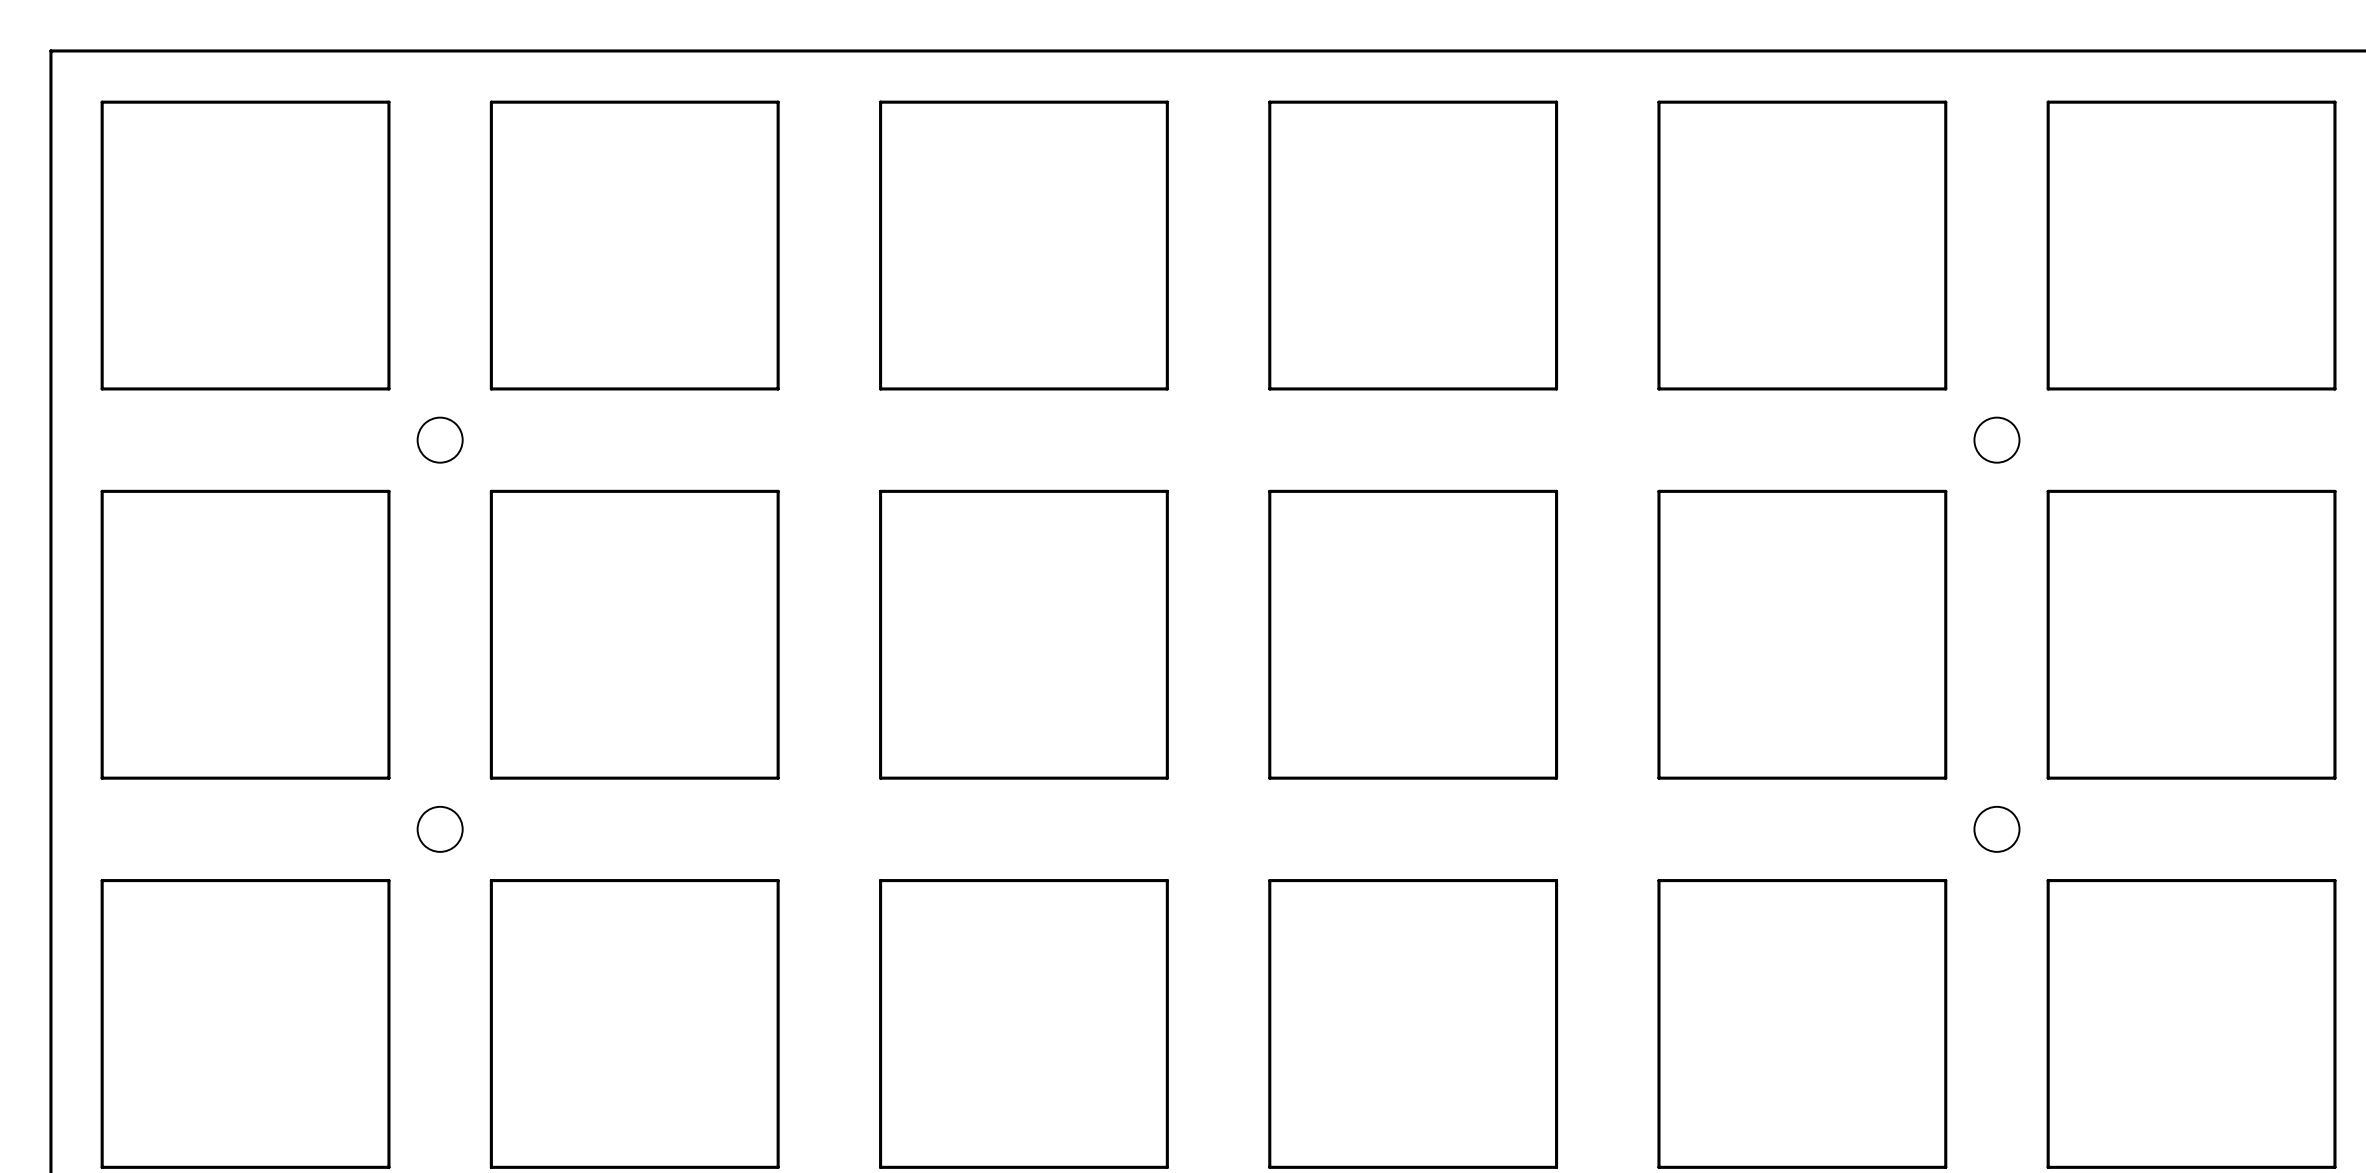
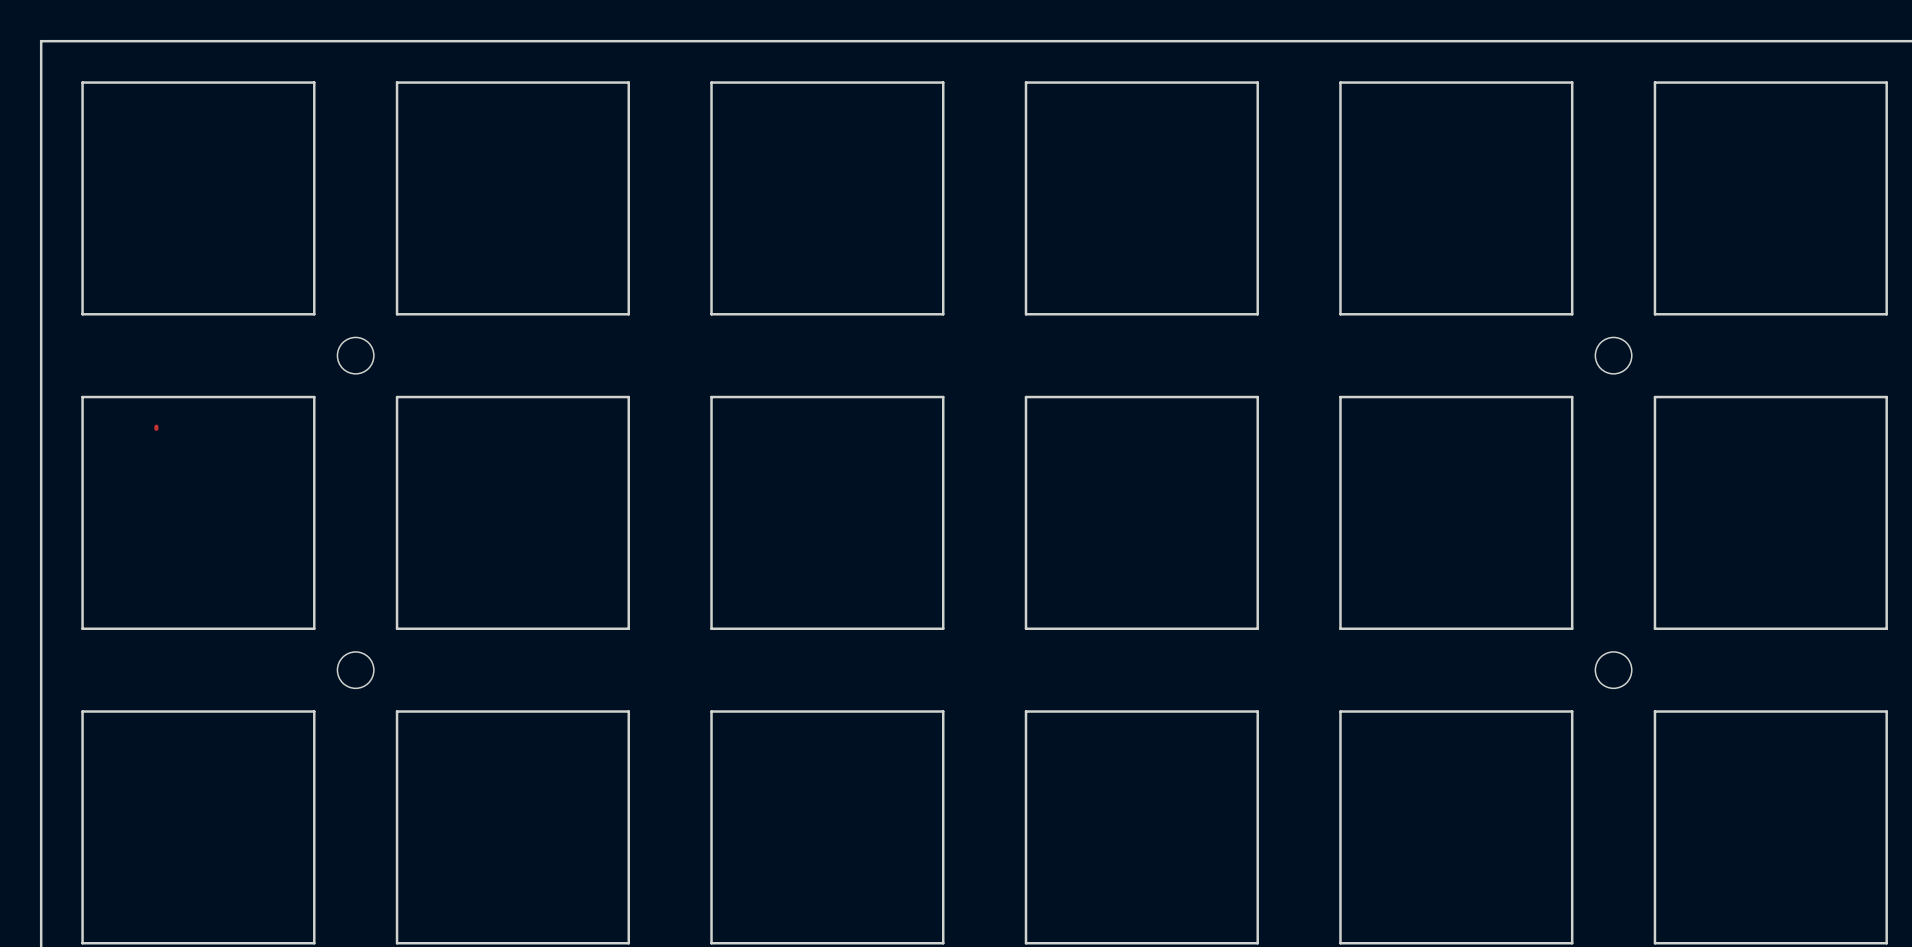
track: none -> (156, 426) (156, 428)

